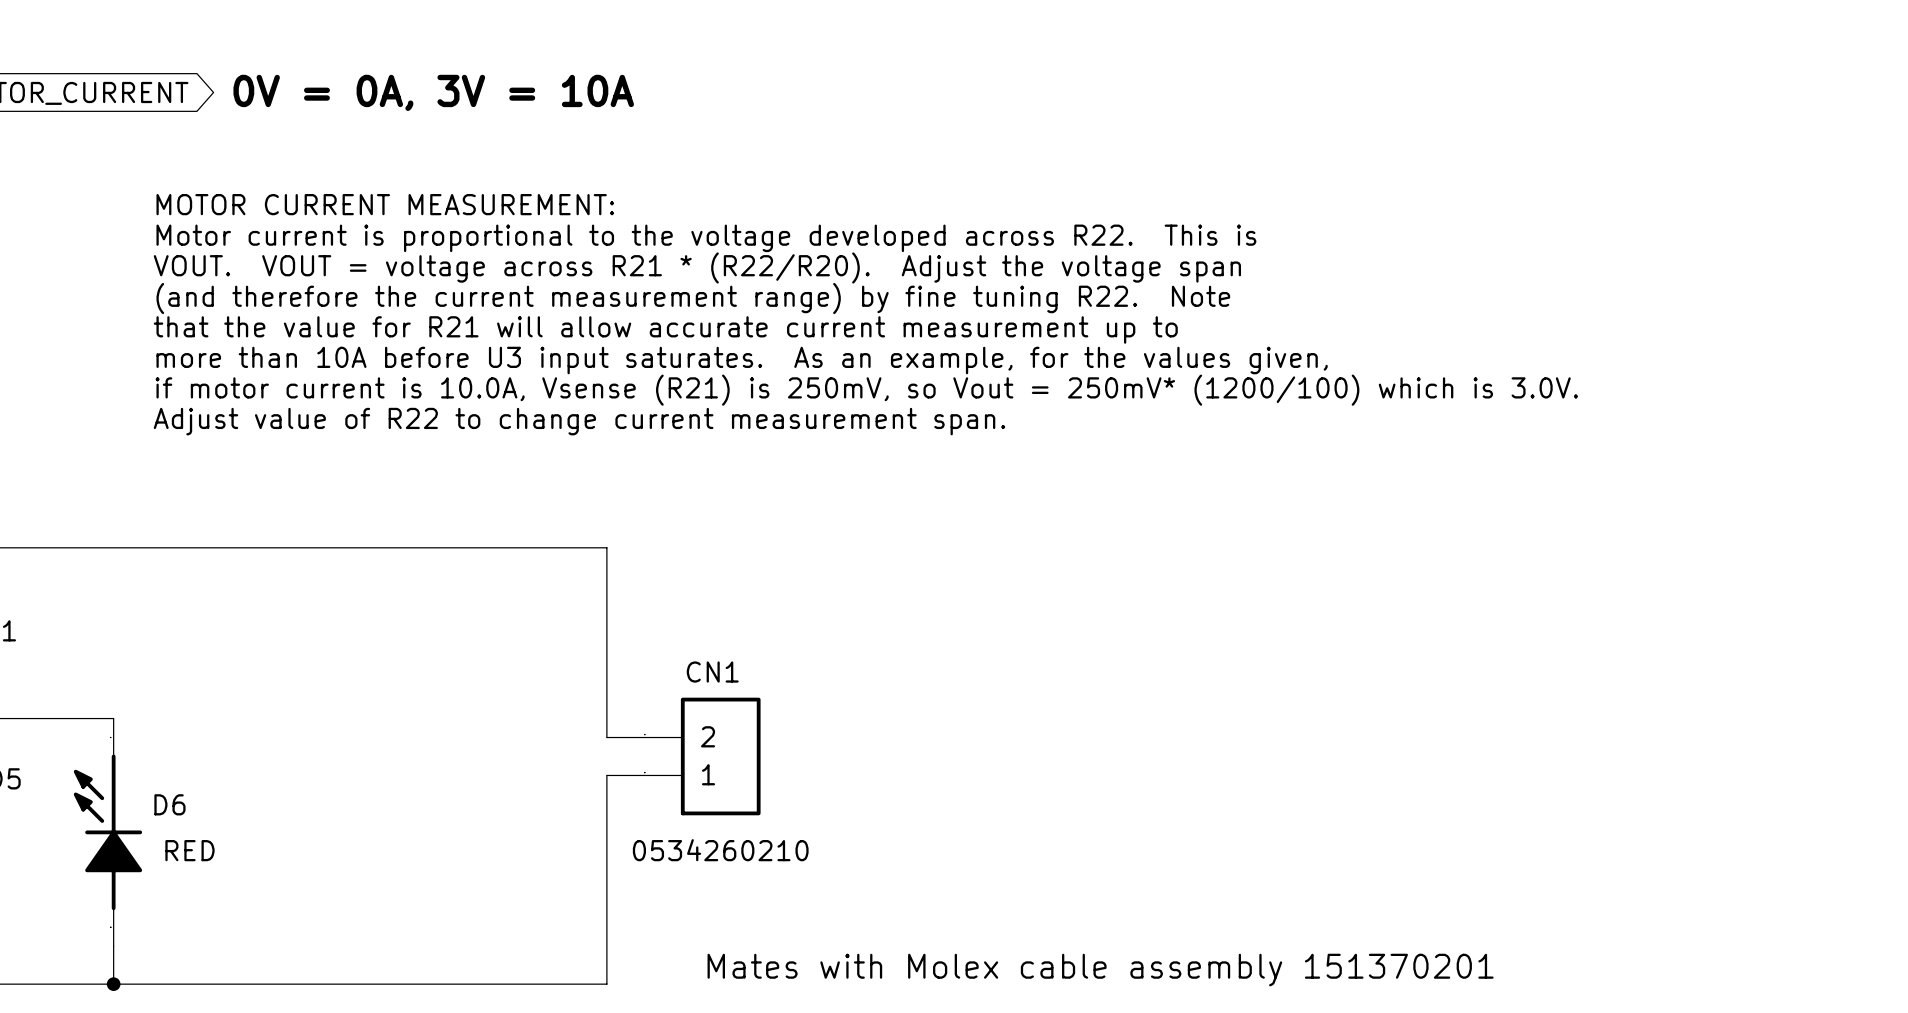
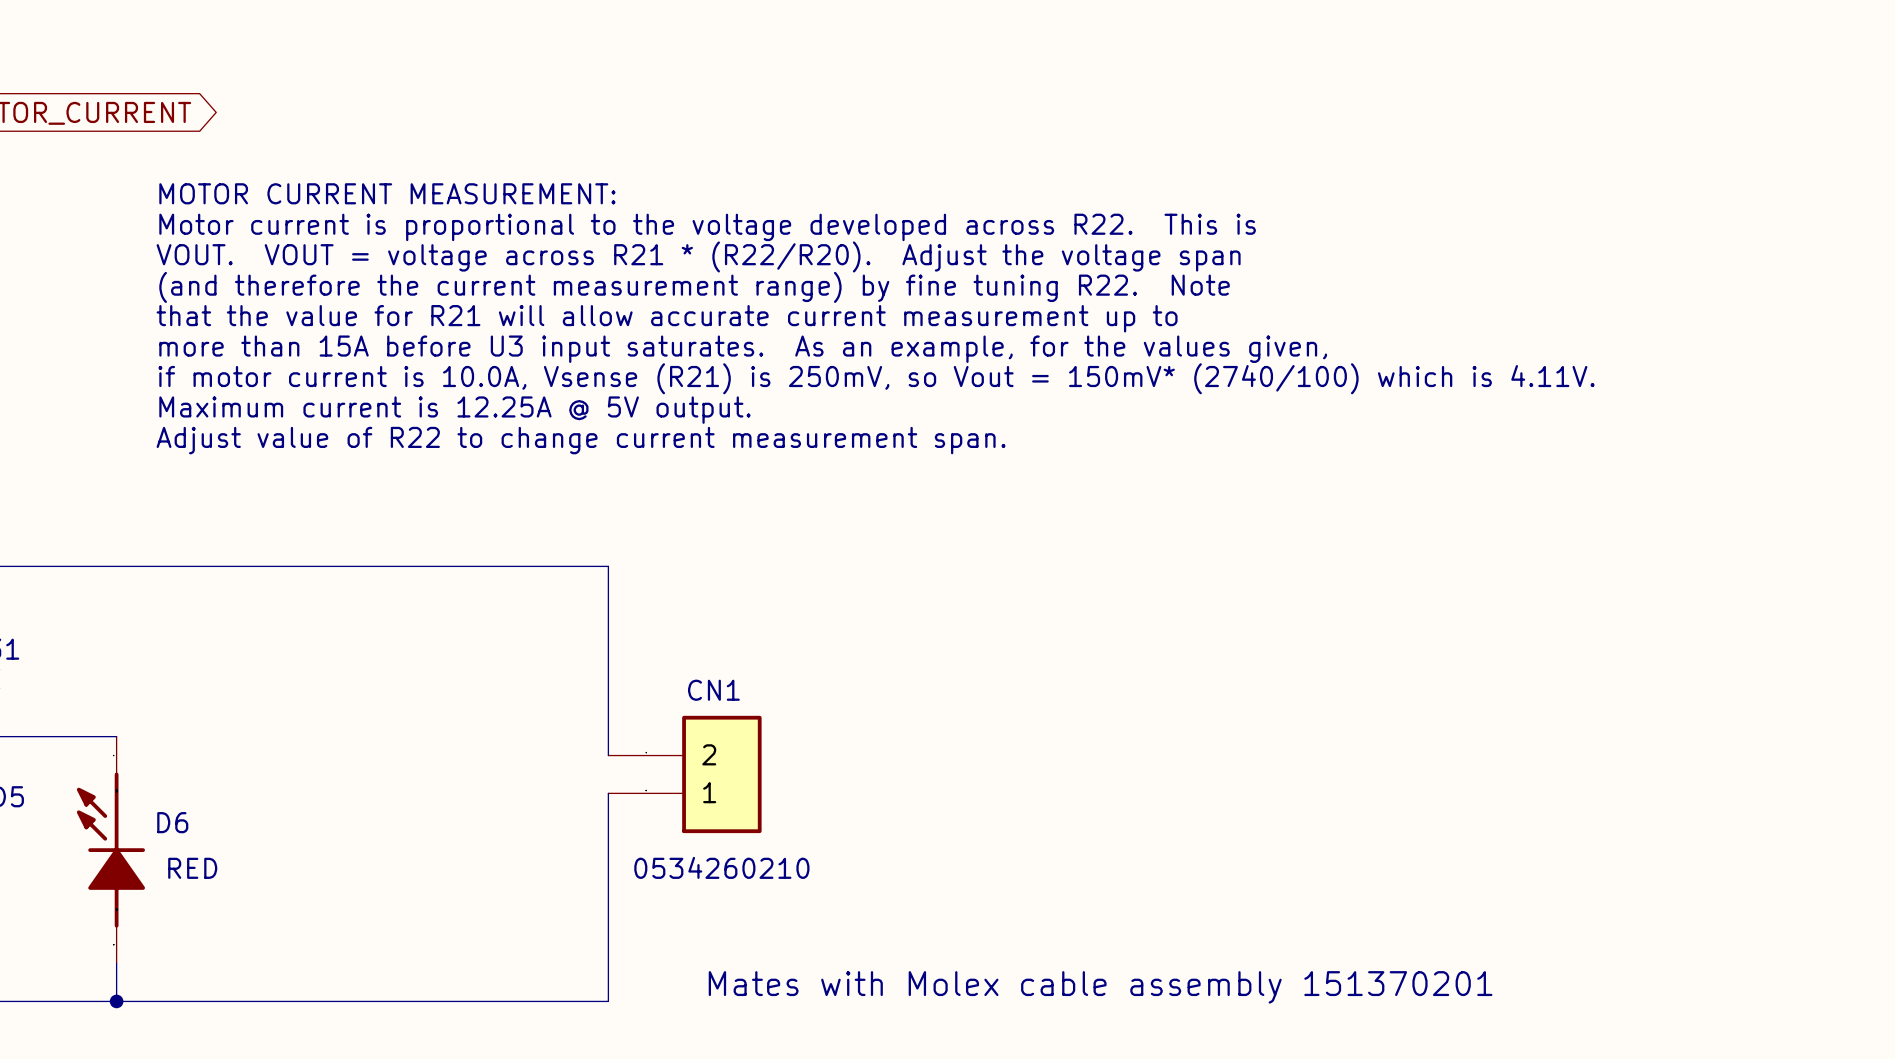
text: 0V = 0A, 3V = 10A (433, 92) -> none
text: none -> MOTOR CURRENT MEASUREMENT: (387, 193)
text: MOTOR CURRENT MEASUREMENT: (385, 204) -> Motor current is proportional to the voltage developed across R22. This is (707, 227)
text: Motor current is proportional to the voltage developed across R22. This is (706, 238) -> VOUT. VOUT = voltage across R21 * (R22/R20). Adjust the voltage span (698, 256)
text: VOUT. VOUT = voltage across R21 * (R22/R20). Adjust the voltage span (697, 267) -> (and therefore the current measurement range) by fine tuning R22. Note (694, 287)
text: (and therefore the current measurement range) by fine tuning R22. Note (693, 298) -> that the value for R21 will allow accurate current measurement up to (667, 318)
text: that the value for R21 will allow accurate current measurement up to (665, 329) -> more than 15A before U3 input saturates. As an example, for the values given, (743, 349)
text: more than 10A before U3 input saturates. As an example, for the values given, (742, 360) -> if motor current is 10.0A, Vsense (R21) is 250mV, so Vout = 150mV* (2740/100) which is 4.11V. (876, 378)
text: if motor current is 10.0A, Vsense (R21) is 250mV, so Vout = 250mV* (1200/100) which is 3.0V. (866, 390) -> Maximum current is 12.25A @ 5V output. (454, 410)

